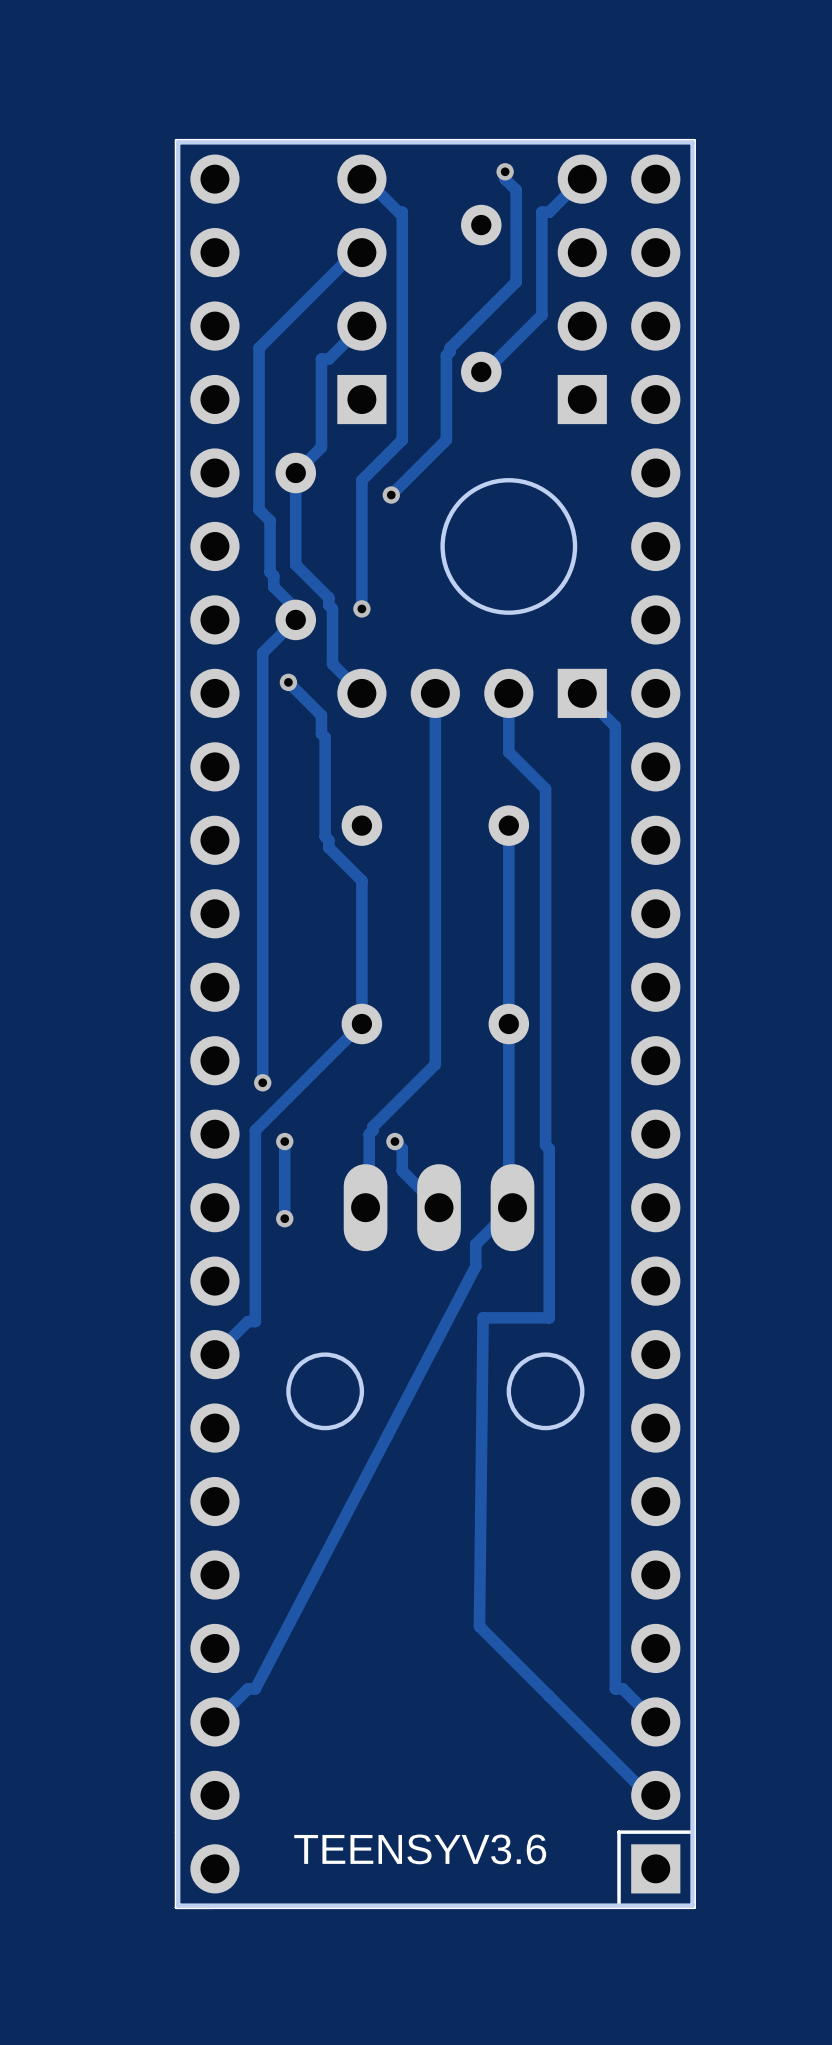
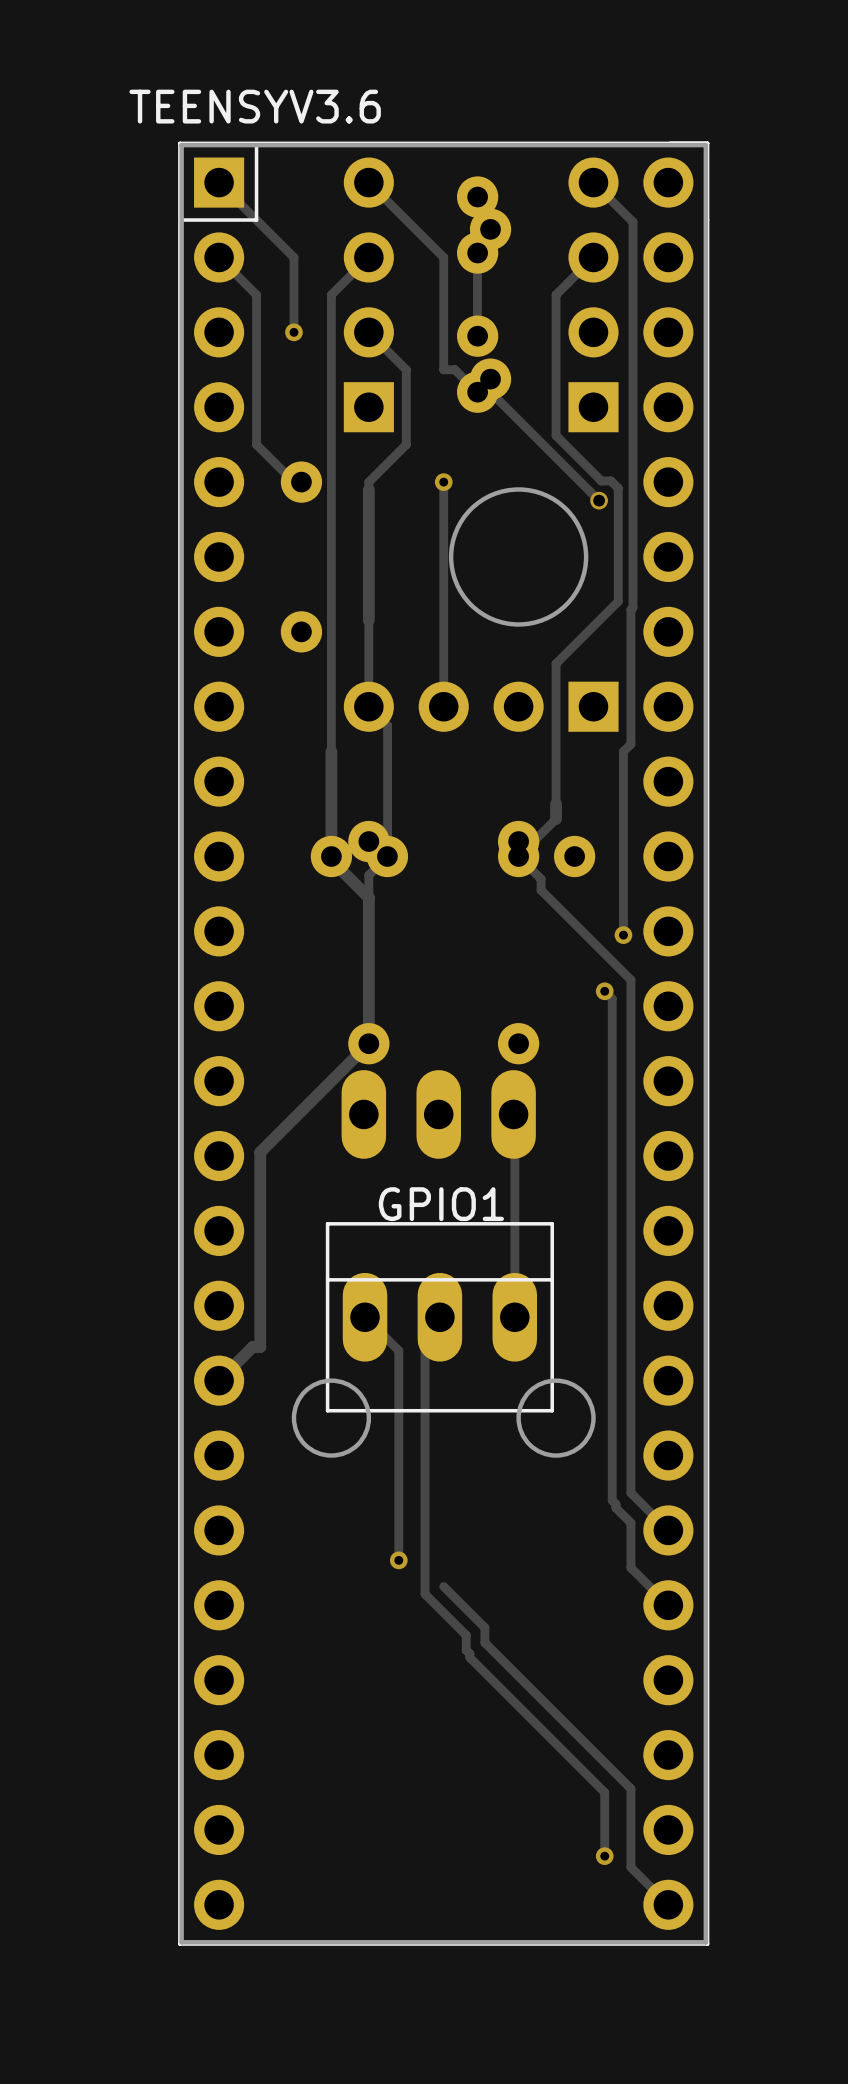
track: (505, 171) (505, 179) (516, 190) (516, 281) (450, 348) (450, 351) (446, 355) (446, 439) (391, 495) -> none
via: (505, 171) -> none
track: none -> (219, 182) (293, 257) (293, 332)
track: (361, 179) (365, 179) (398, 212) (402, 212) (402, 439) (361, 480) -> (368, 332) (406, 369) (406, 444) (368, 482) (368, 489)
track: none -> (368, 182) (443, 257) (443, 369) (454, 369) (477, 392) (490, 392) (599, 500)
track: (582, 179) (549, 212) (541, 212) (541, 315) (486, 370) (481, 371) -> (593, 182) (633, 222) (633, 607) (630, 609) (630, 744) (623, 751) (623, 935)
part: none -> (477, 225)
track: none -> (477, 253) (477, 336)
track: none -> (219, 257) (256, 294) (256, 444) (305, 493)
track: (361, 252) (354, 252) (259, 348) (259, 509) (270, 520) (270, 572) (273, 575) (273, 586) (295, 608) (295, 619) (262, 652) (262, 1082) -> (368, 257) (331, 294) (331, 751)
via: none -> (293, 332)
track: (361, 326) (328, 359) (321, 359) (321, 447) (295, 473) (295, 564) (328, 597) (328, 605) (332, 608) (332, 664) (361, 693) -> none
part: none -> (477, 364)
via: none -> (599, 500)
via position: (391, 495) -> (443, 482)
track: none -> (368, 620) (368, 706) (387, 725) (387, 856) (368, 875) (368, 897)
via: (361, 608) -> none
track: (288, 682) (321, 715) (321, 733) (325, 737) -> none
via: (288, 682) -> none
track: (435, 693) (435, 1064) (372, 1126) (372, 1130) (369, 1134) (369, 1203) (365, 1207) -> (443, 706) (443, 482)
track: (508, 693) (508, 752) (545, 788) -> (593, 257) (556, 294) (556, 435) (601, 480) (610, 480) (618, 488) (618, 601) (556, 663) (556, 804)
track: (582, 693) (615, 726) (615, 1688) (622, 1688) (655, 1721) -> none
track: (545, 803) (545, 1145) (549, 1148) (549, 1317) (483, 1317) (479, 1626) (648, 1795) (655, 1795) -> (556, 819) (518, 856) (541, 878) (541, 890) (630, 980) (630, 1492) (668, 1530)
track: (508, 825) (508, 1203) (512, 1207) (475, 1244) (475, 1266) (255, 1688) (248, 1688) (214, 1721) -> none
part: none -> (359, 856)
part: none -> (546, 856)
via: none -> (623, 935)
track: none -> (604, 991) (612, 998) (612, 1500) (615, 1504) (615, 1507) (630, 1522) (630, 1567) (668, 1605)
via: none -> (604, 991)
TEENSYV3.6 rotation: 0° (435, 1024) -> 180° (443, 1043)
via: (262, 1082) -> none
track: none -> (513, 1114) (514, 1317)
track: (284, 1141) (284, 1218) -> none
via: (284, 1141) -> none
track: (394, 1141) (402, 1148) (402, 1170) (439, 1207) -> none
via: (394, 1141) -> none
part position: (439, 1207) -> (438, 1114)
via: (284, 1218) -> none
track: none -> (365, 1317) (398, 1350) (398, 1560)
track: none -> (439, 1317) (425, 1331) (425, 1594) (466, 1635) (466, 1650) (469, 1653) (469, 1657) (604, 1792) (604, 1856)
GPIO1: none -> (439, 1317)
via: none -> (398, 1560)
track: none -> (443, 1586) (484, 1627) (484, 1642) (630, 1788) (630, 1867) (668, 1904)
via: none -> (604, 1856)
TEENSYV3.6 name position: TEENSYV3.6 (420, 1849) -> TEENSYV3.6 (255, 106)

